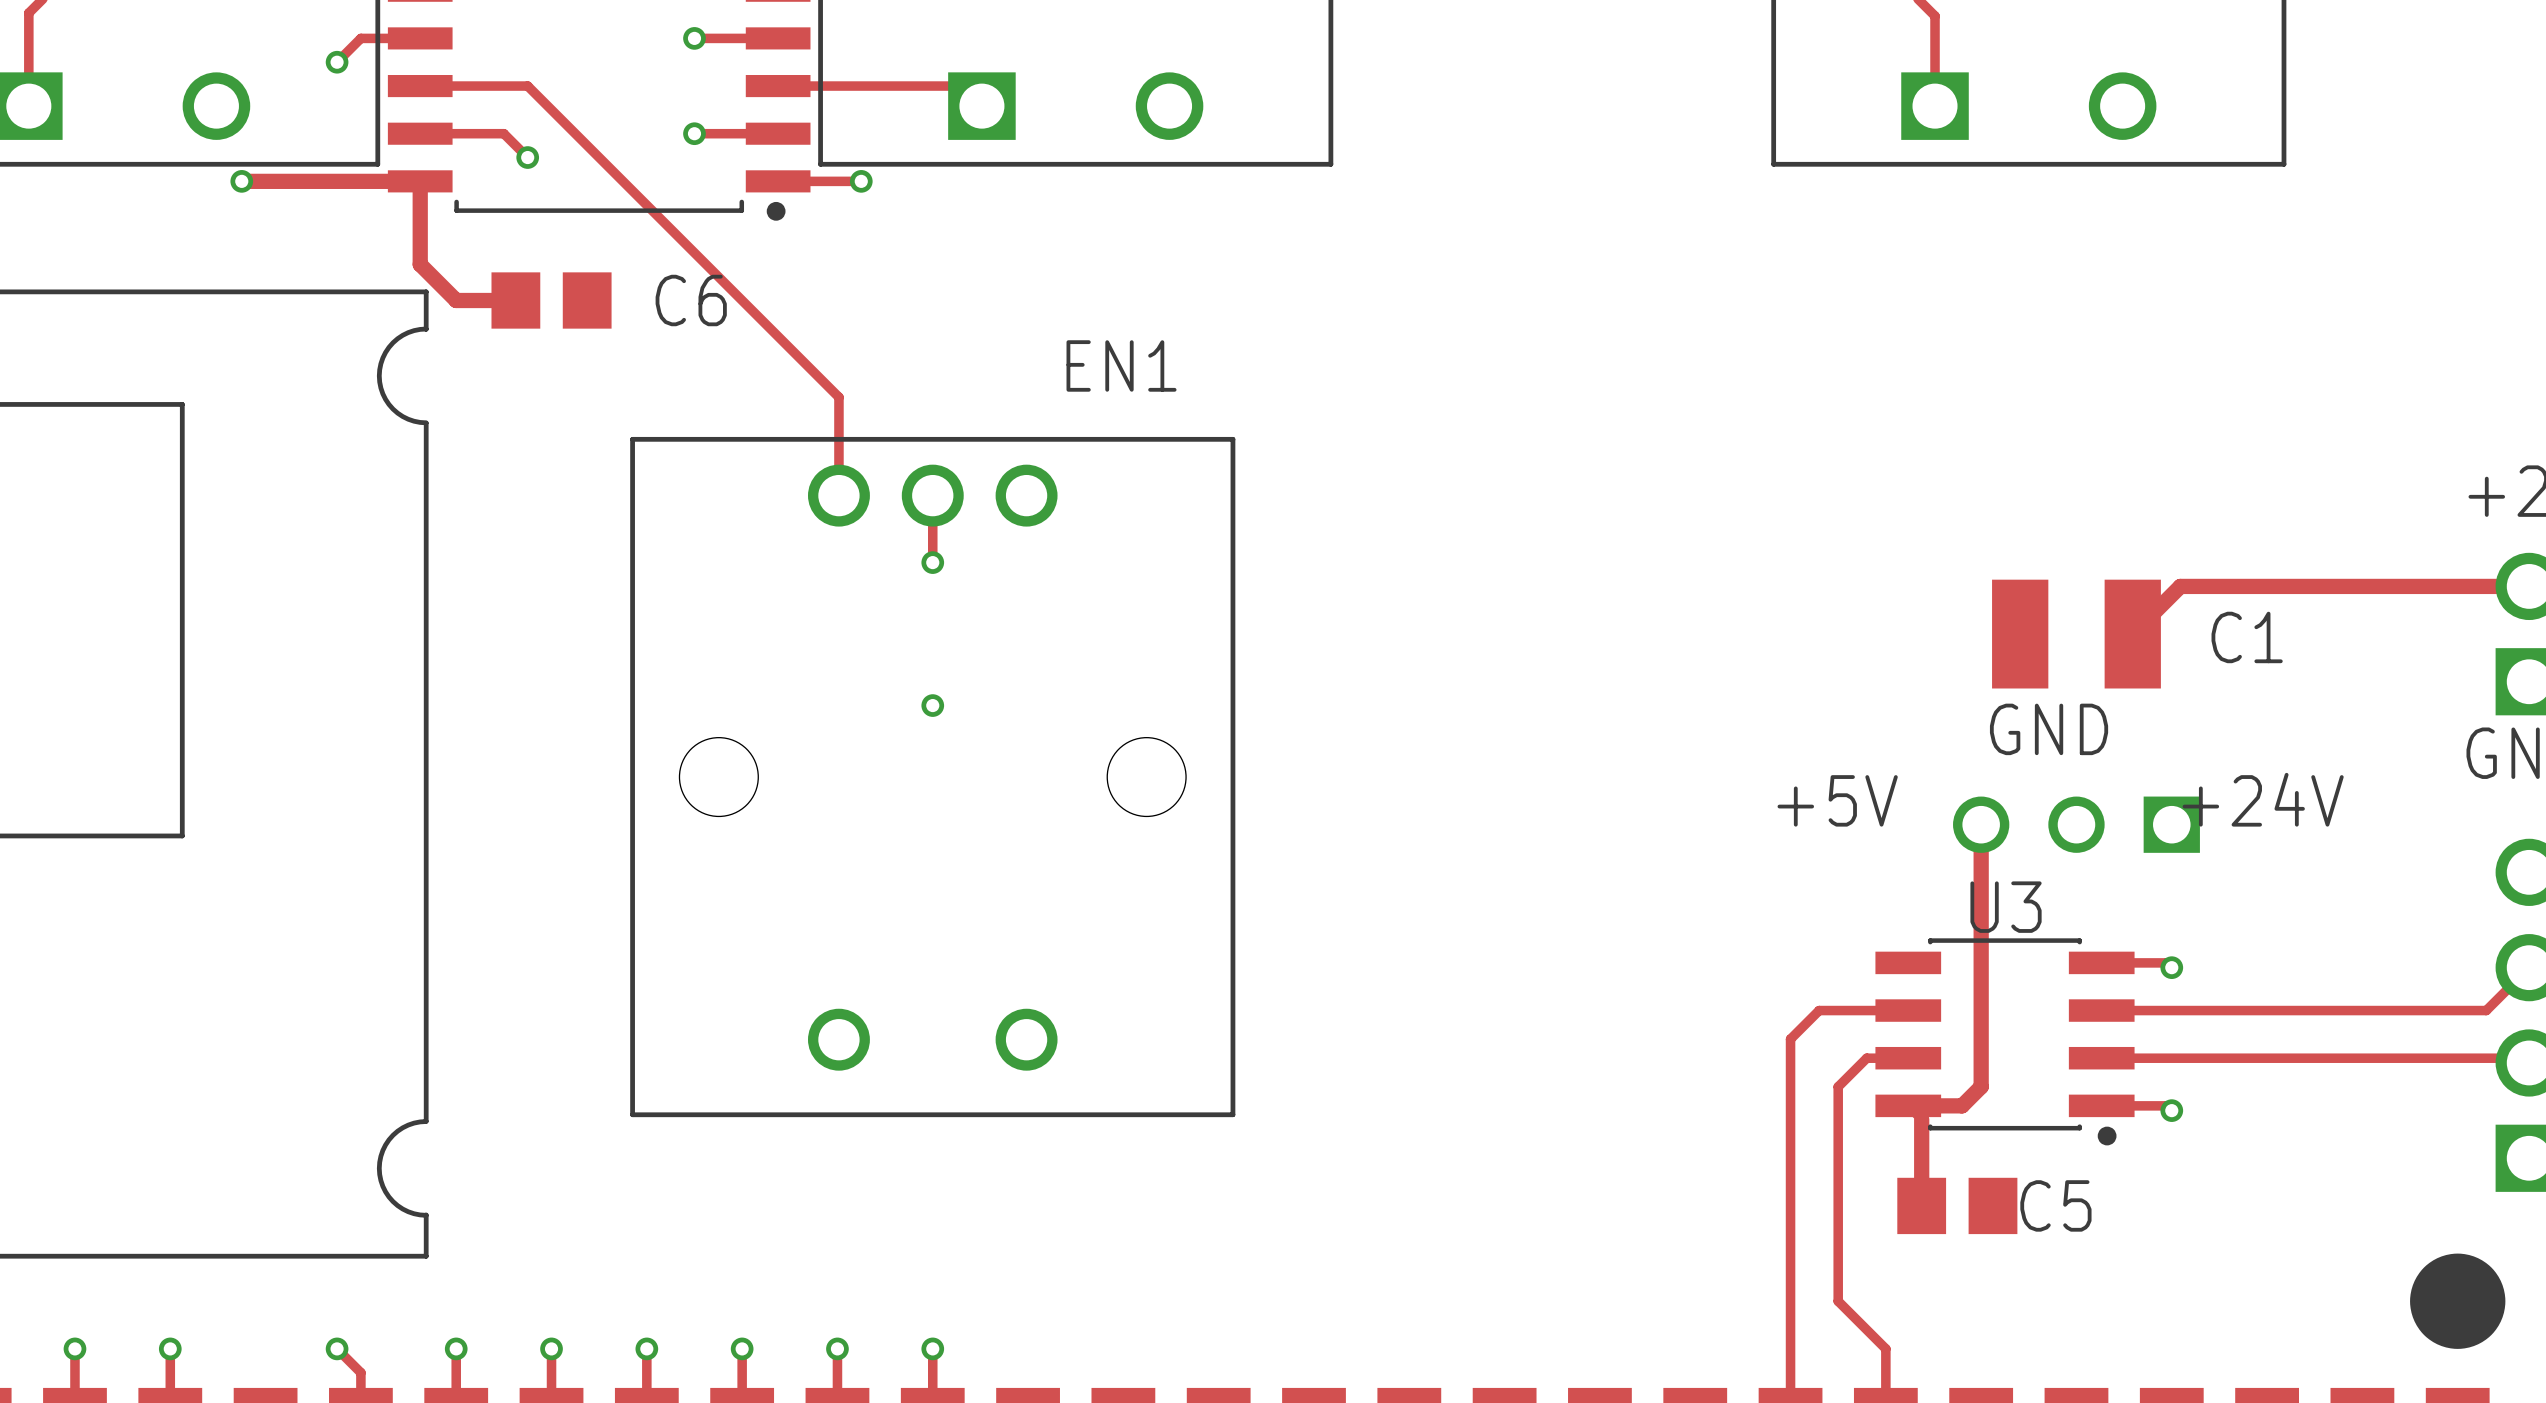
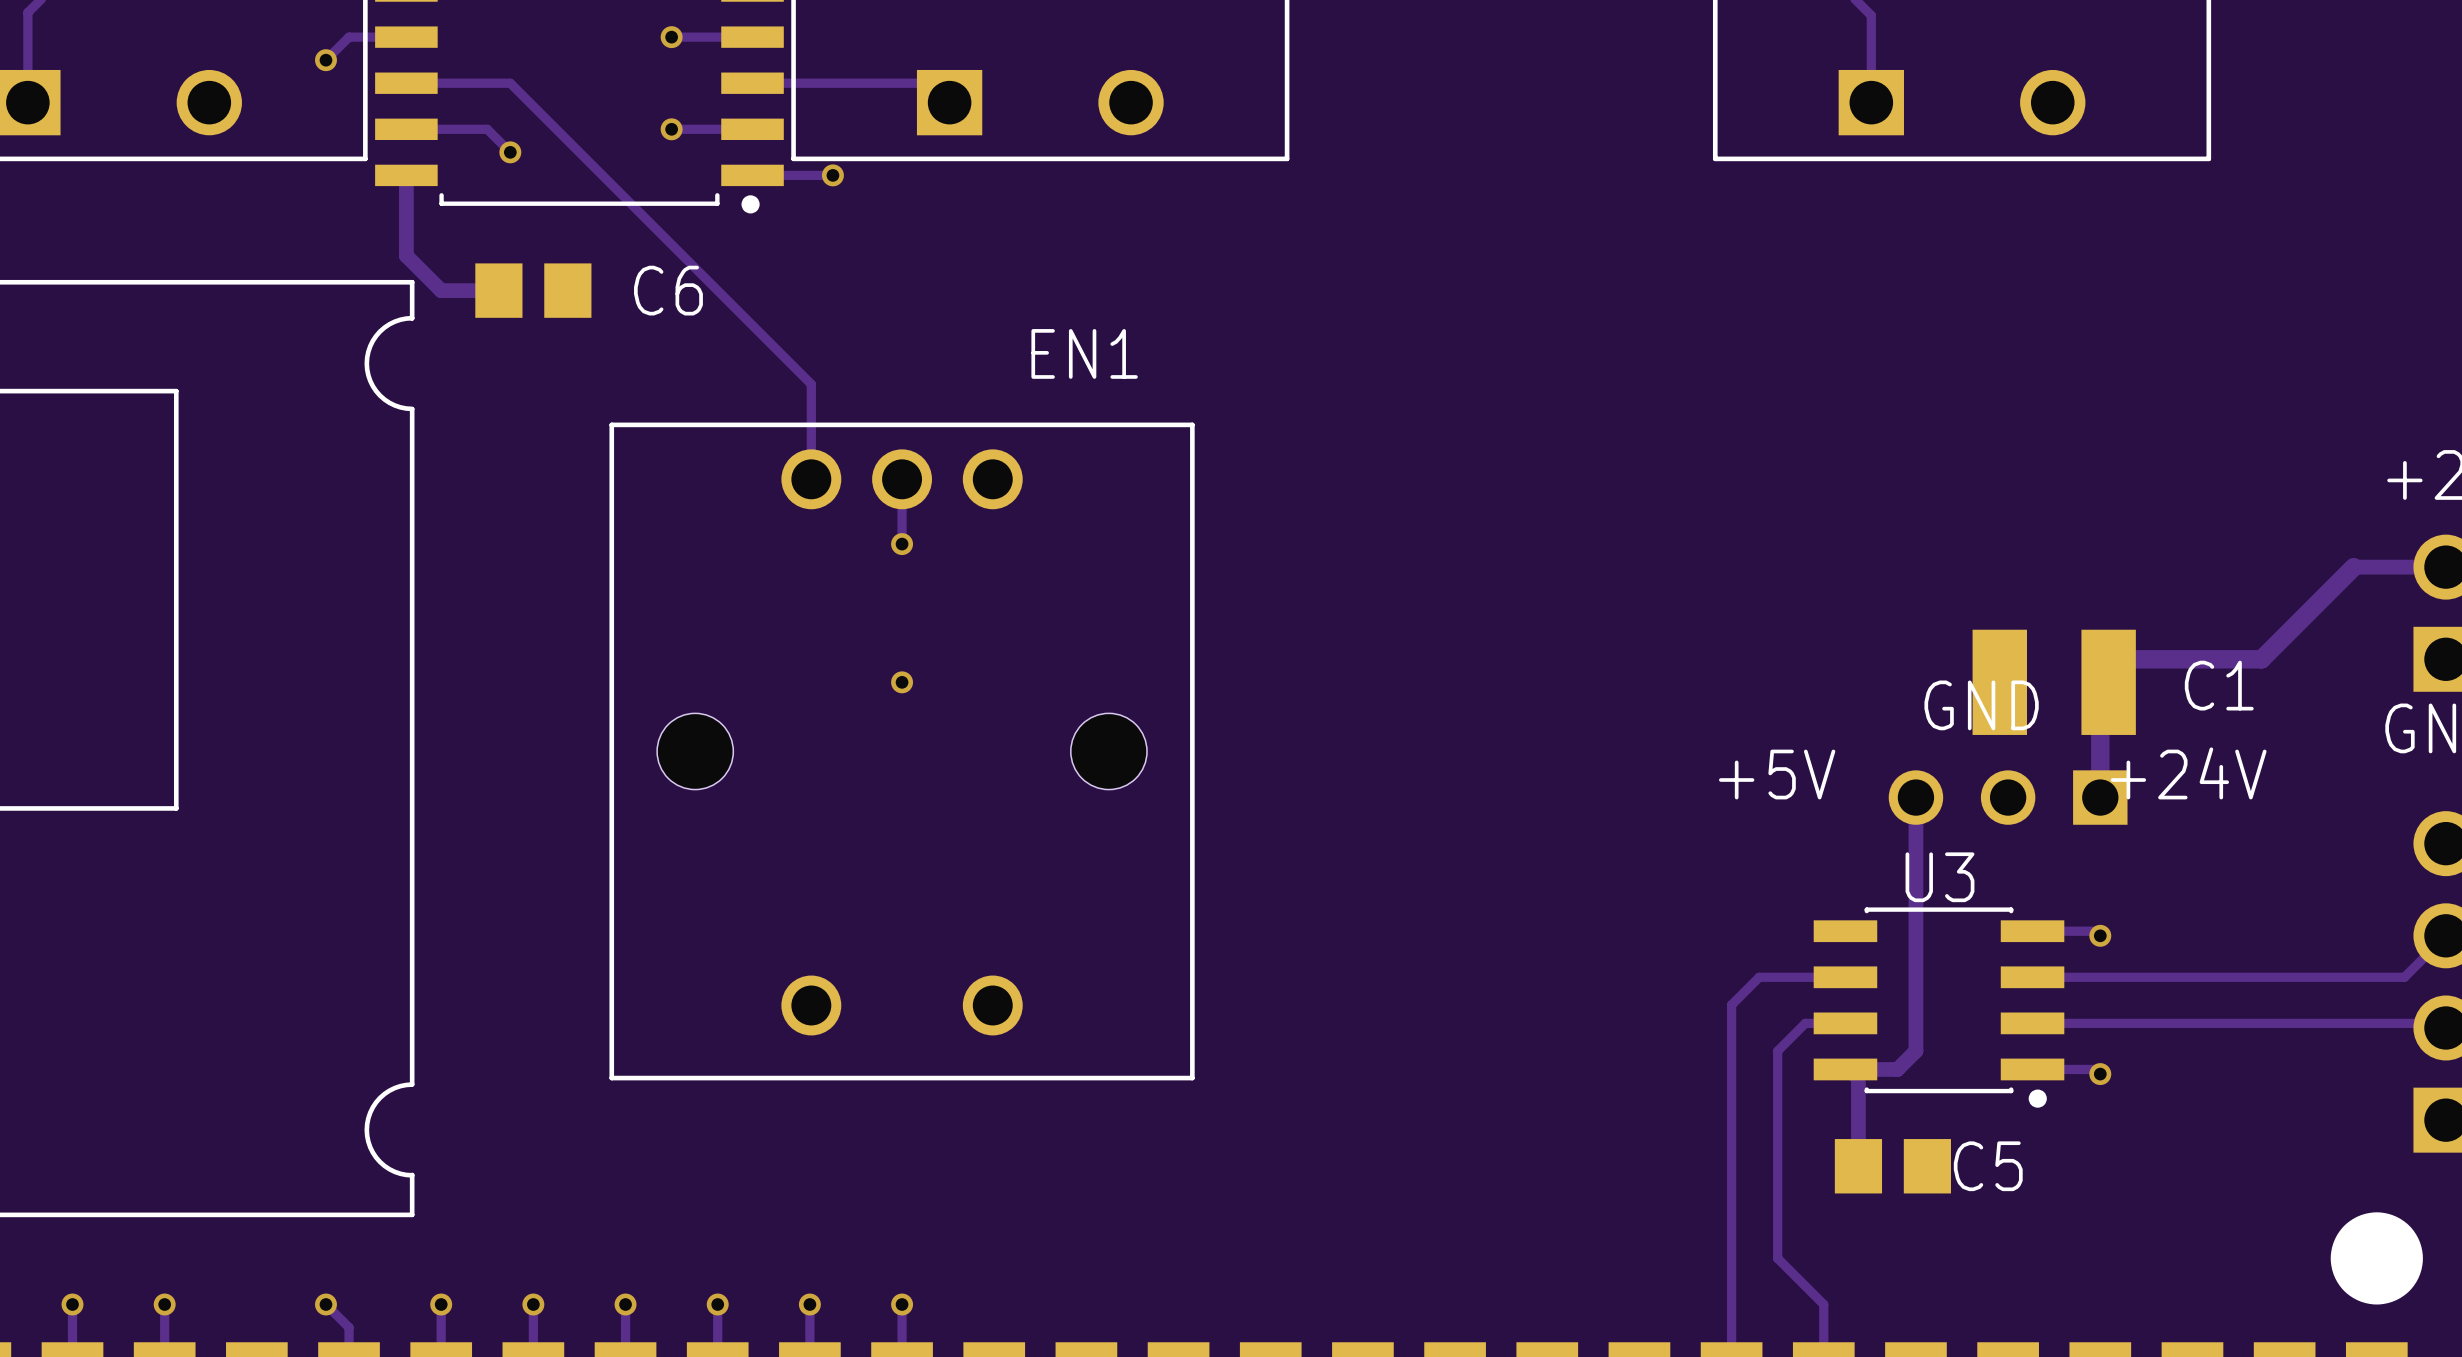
track: (241, 181) (420, 181) -> none
via: (241, 181) -> none
track: (2433, 586) (2180, 586) (2124, 642) -> (2353, 567) (2261, 659) (2131, 659) (2100, 690) (2100, 797)
C1 position: (2076, 634) -> (2054, 682)

